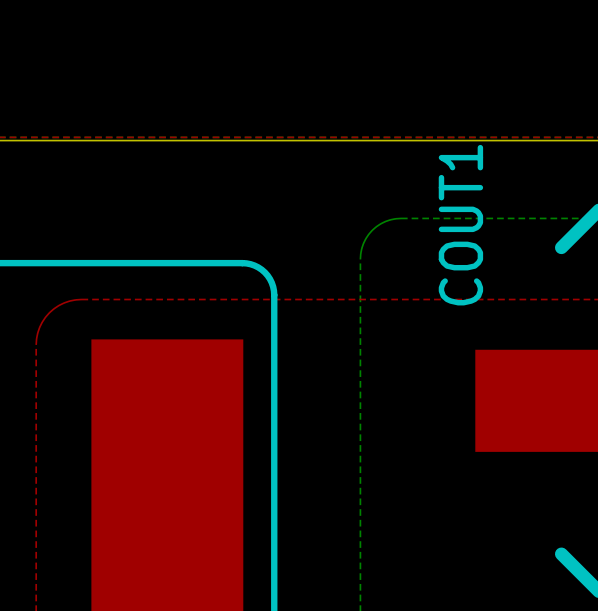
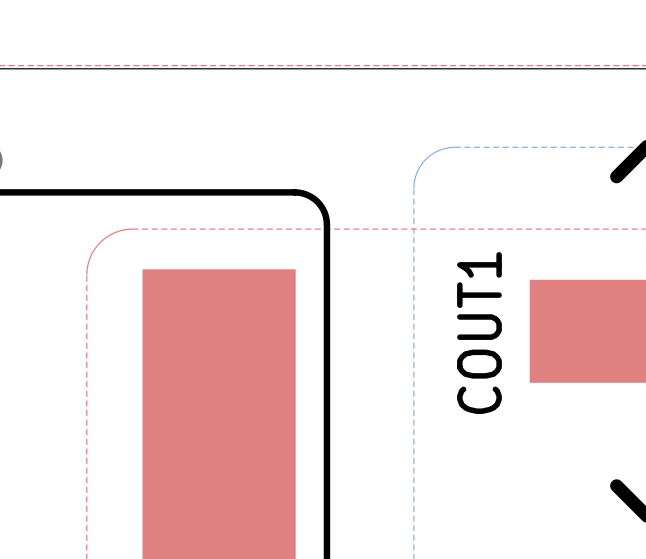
COUT1 name position: COUT1 (460, 225) -> COUT1 (479, 332)

